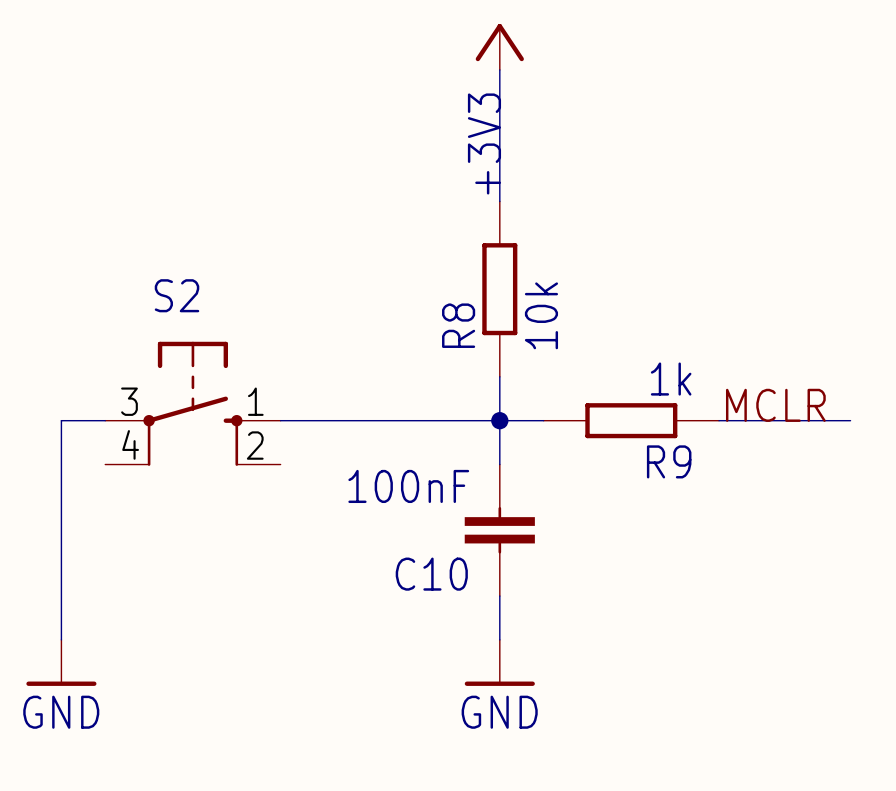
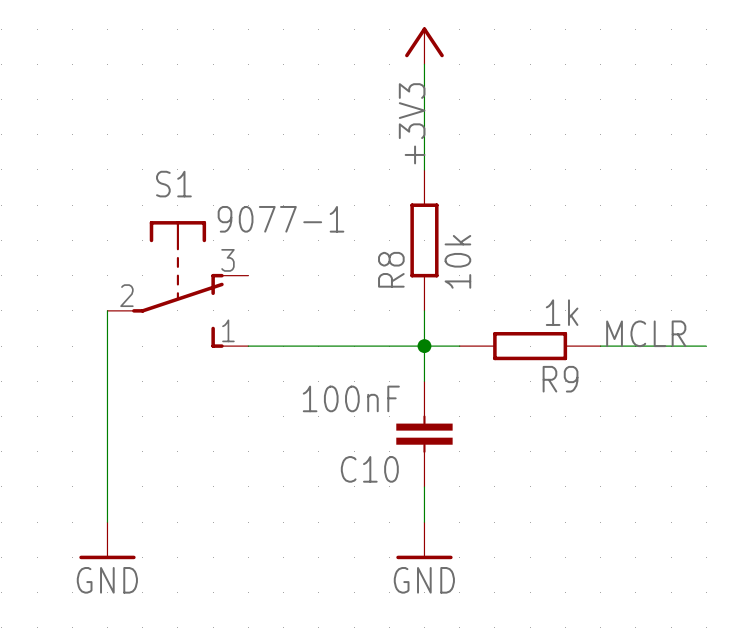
S1: none -> 9077-1 (177, 284)
wire: none -> (107, 310) (107, 522)
S2: (192, 403) -> none
wire: (105, 420) (61, 420) (61, 639) -> none
power symbol position: GND (61, 662) -> GND (107, 540)

